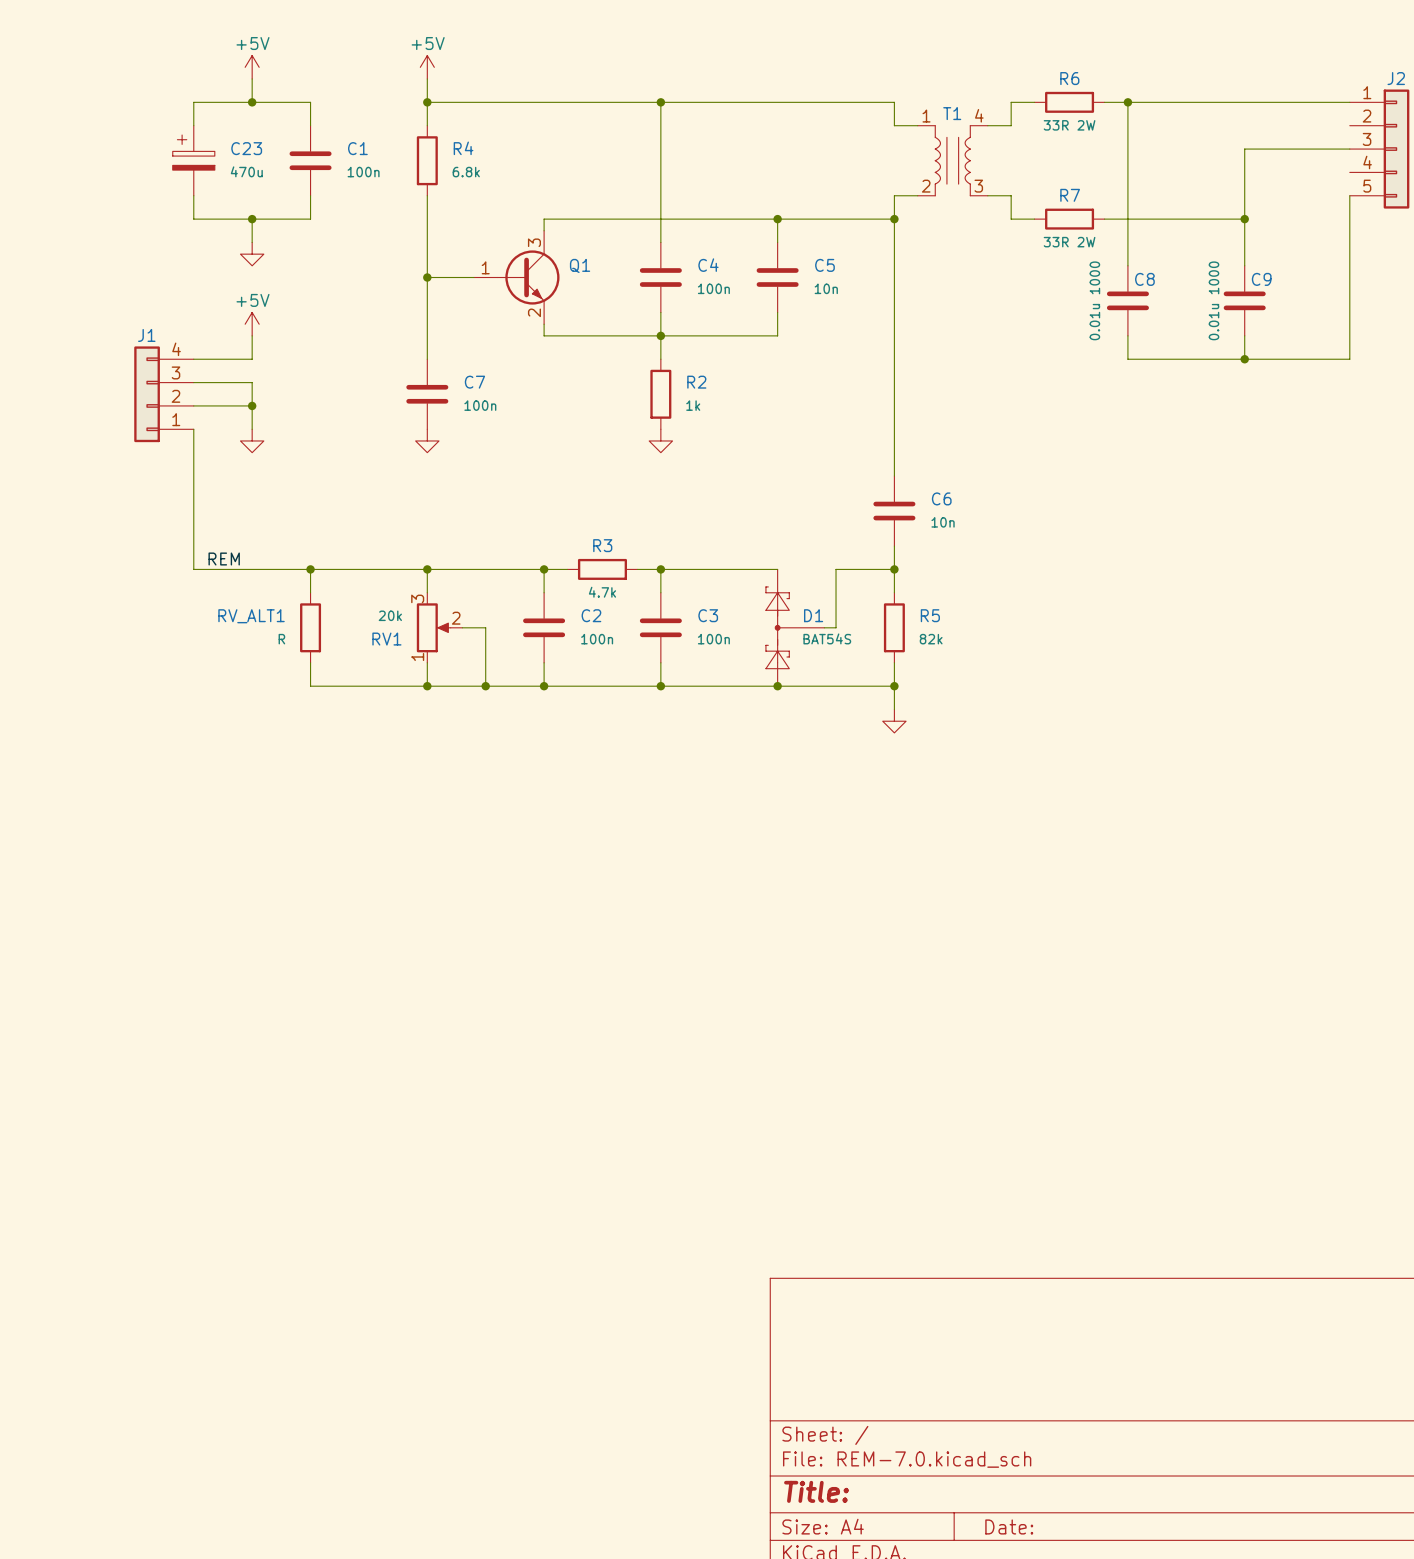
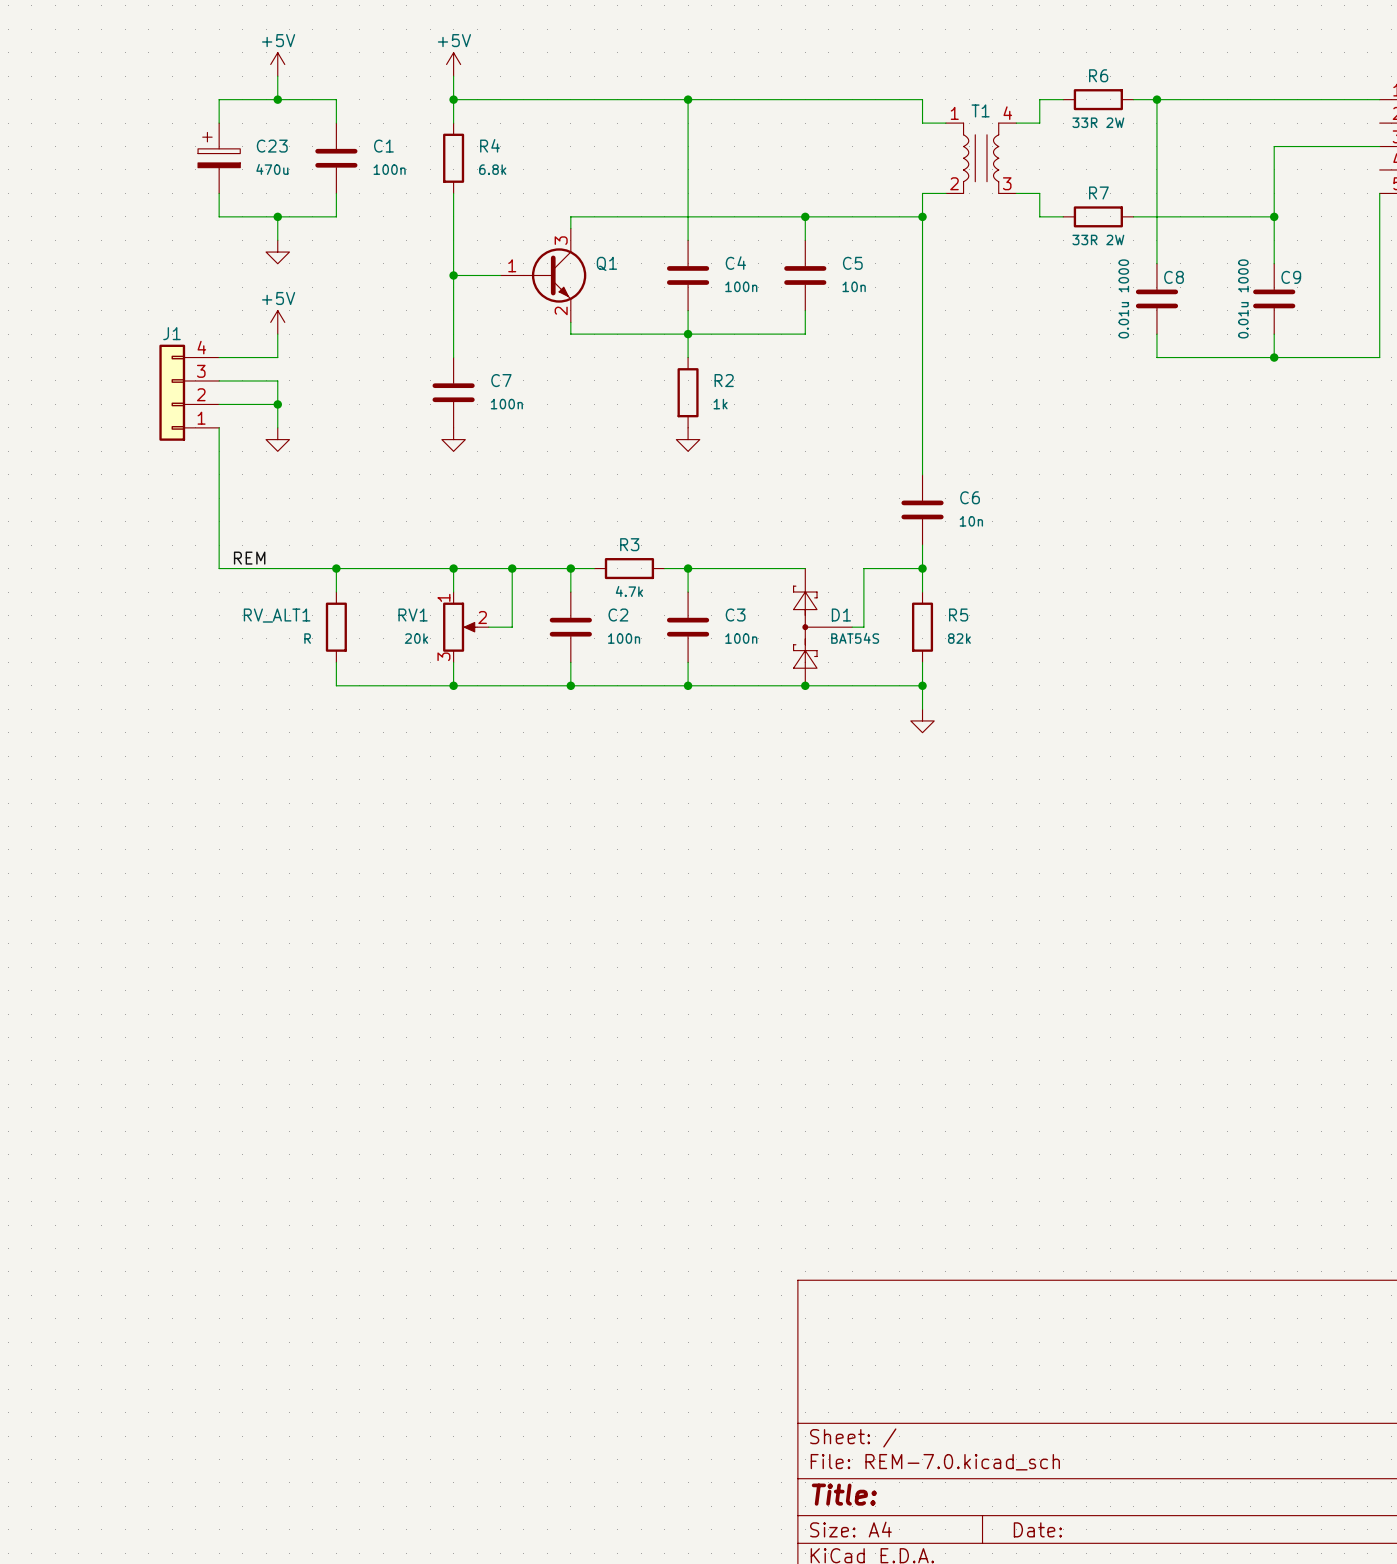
junction: none -> (512, 568)
RV1 flip: as is (433, 627) -> up-down (460, 627)
wire: (485, 627) (485, 686) -> (512, 627) (512, 568)
junction: (485, 686) -> none

